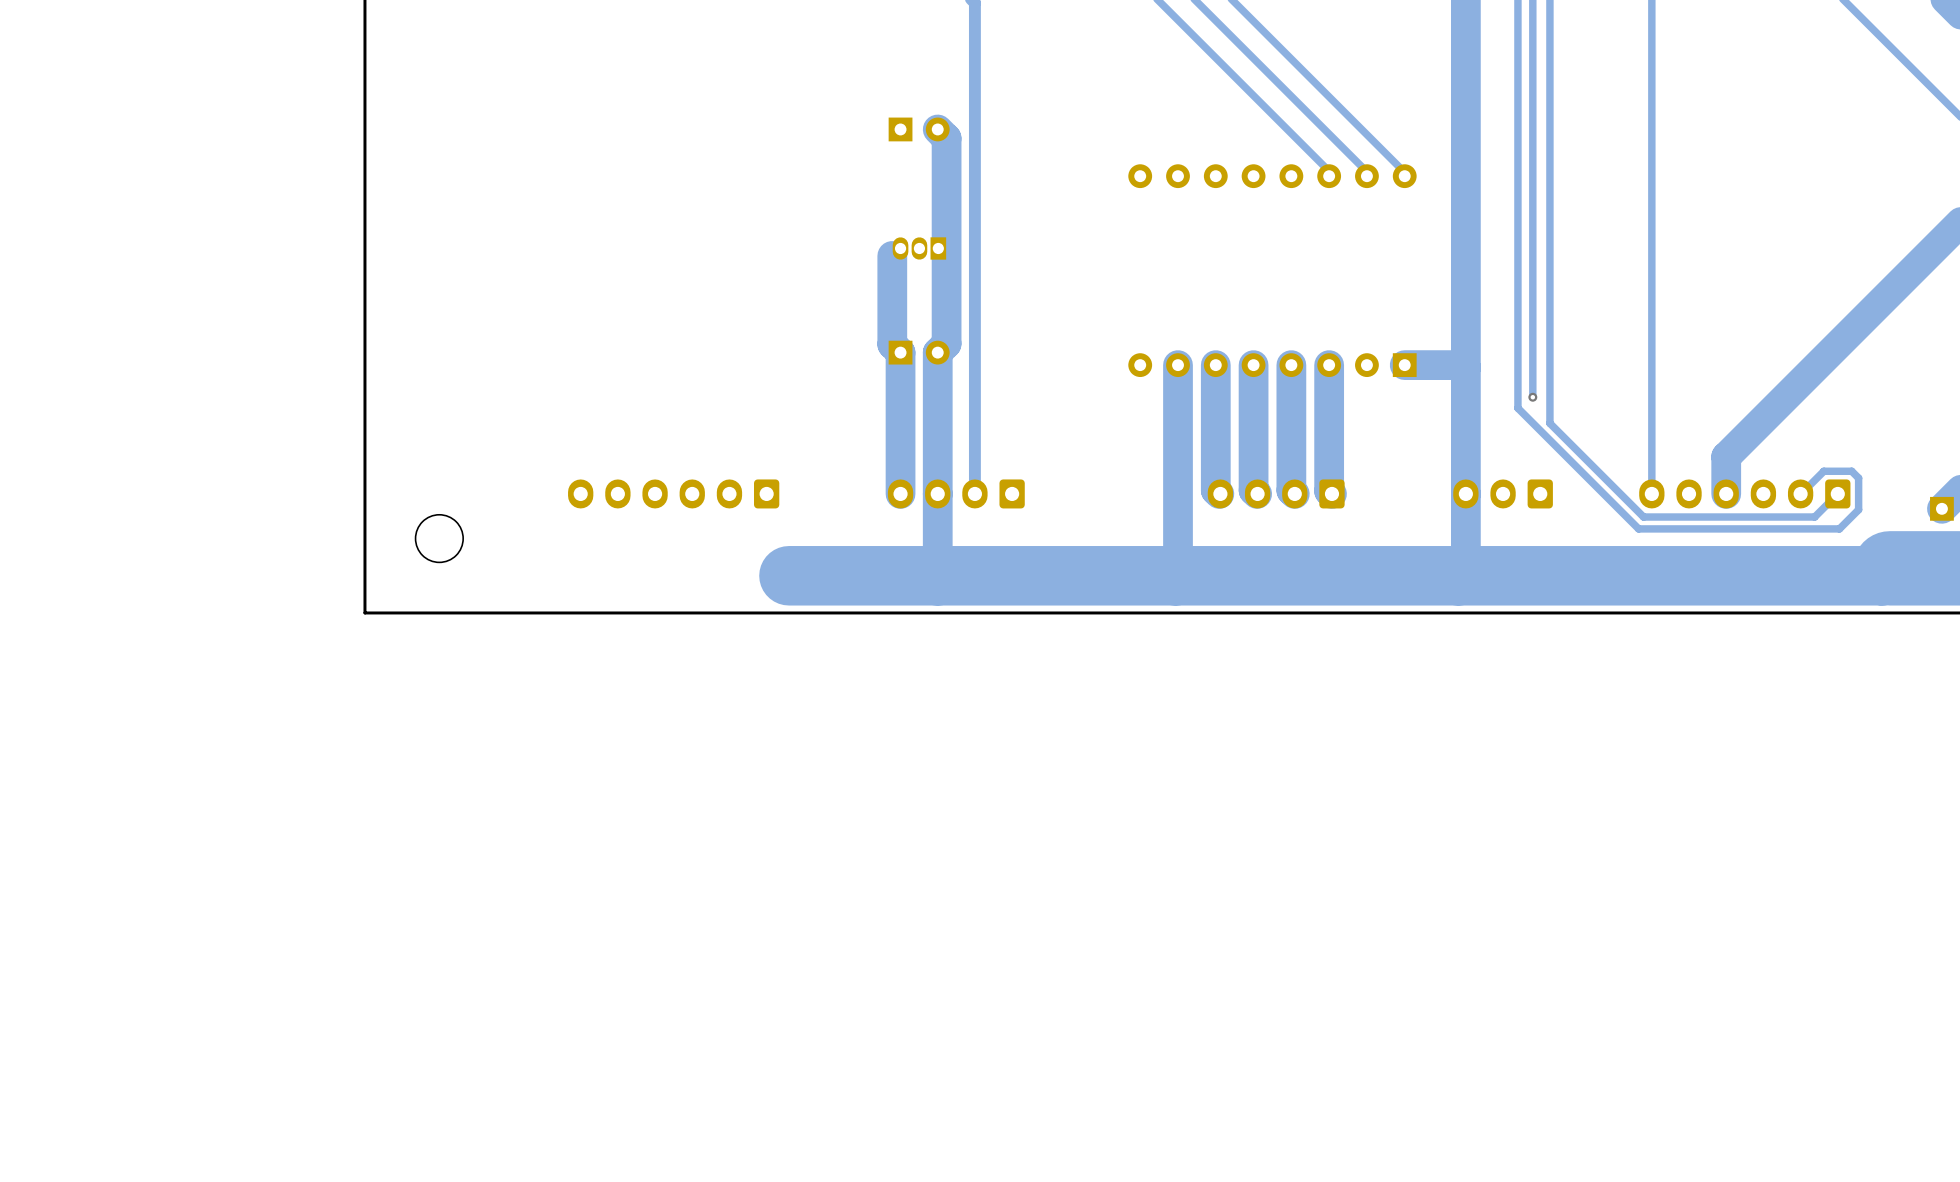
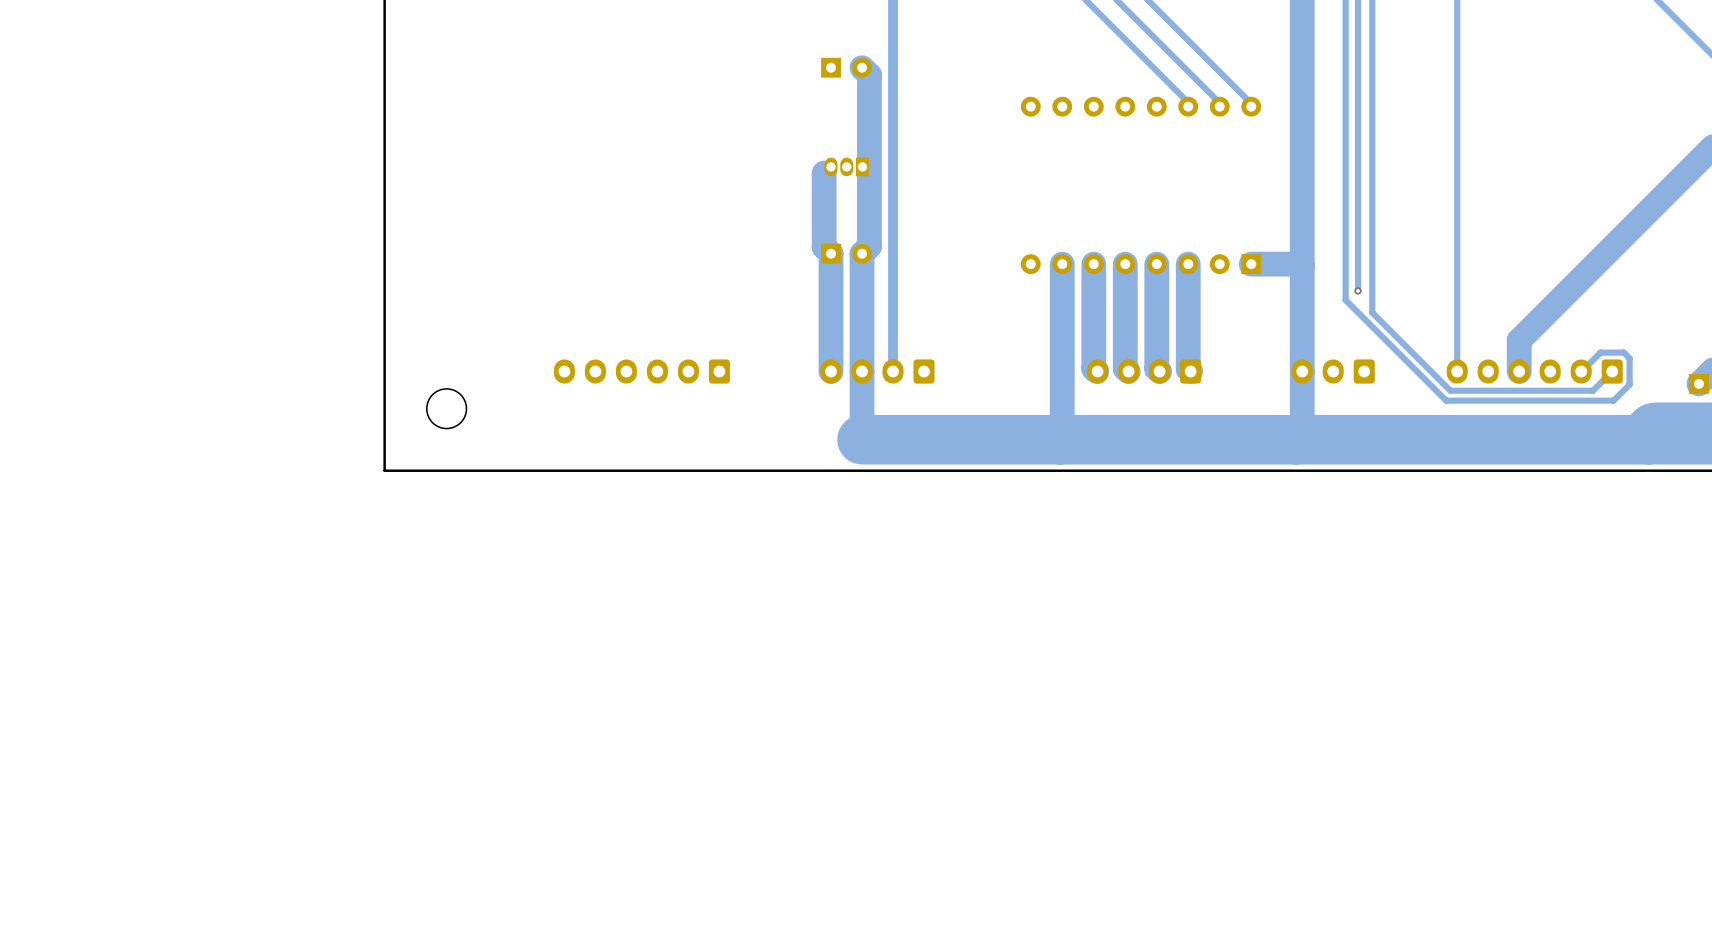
track: (937, 575) (788, 575) -> none

